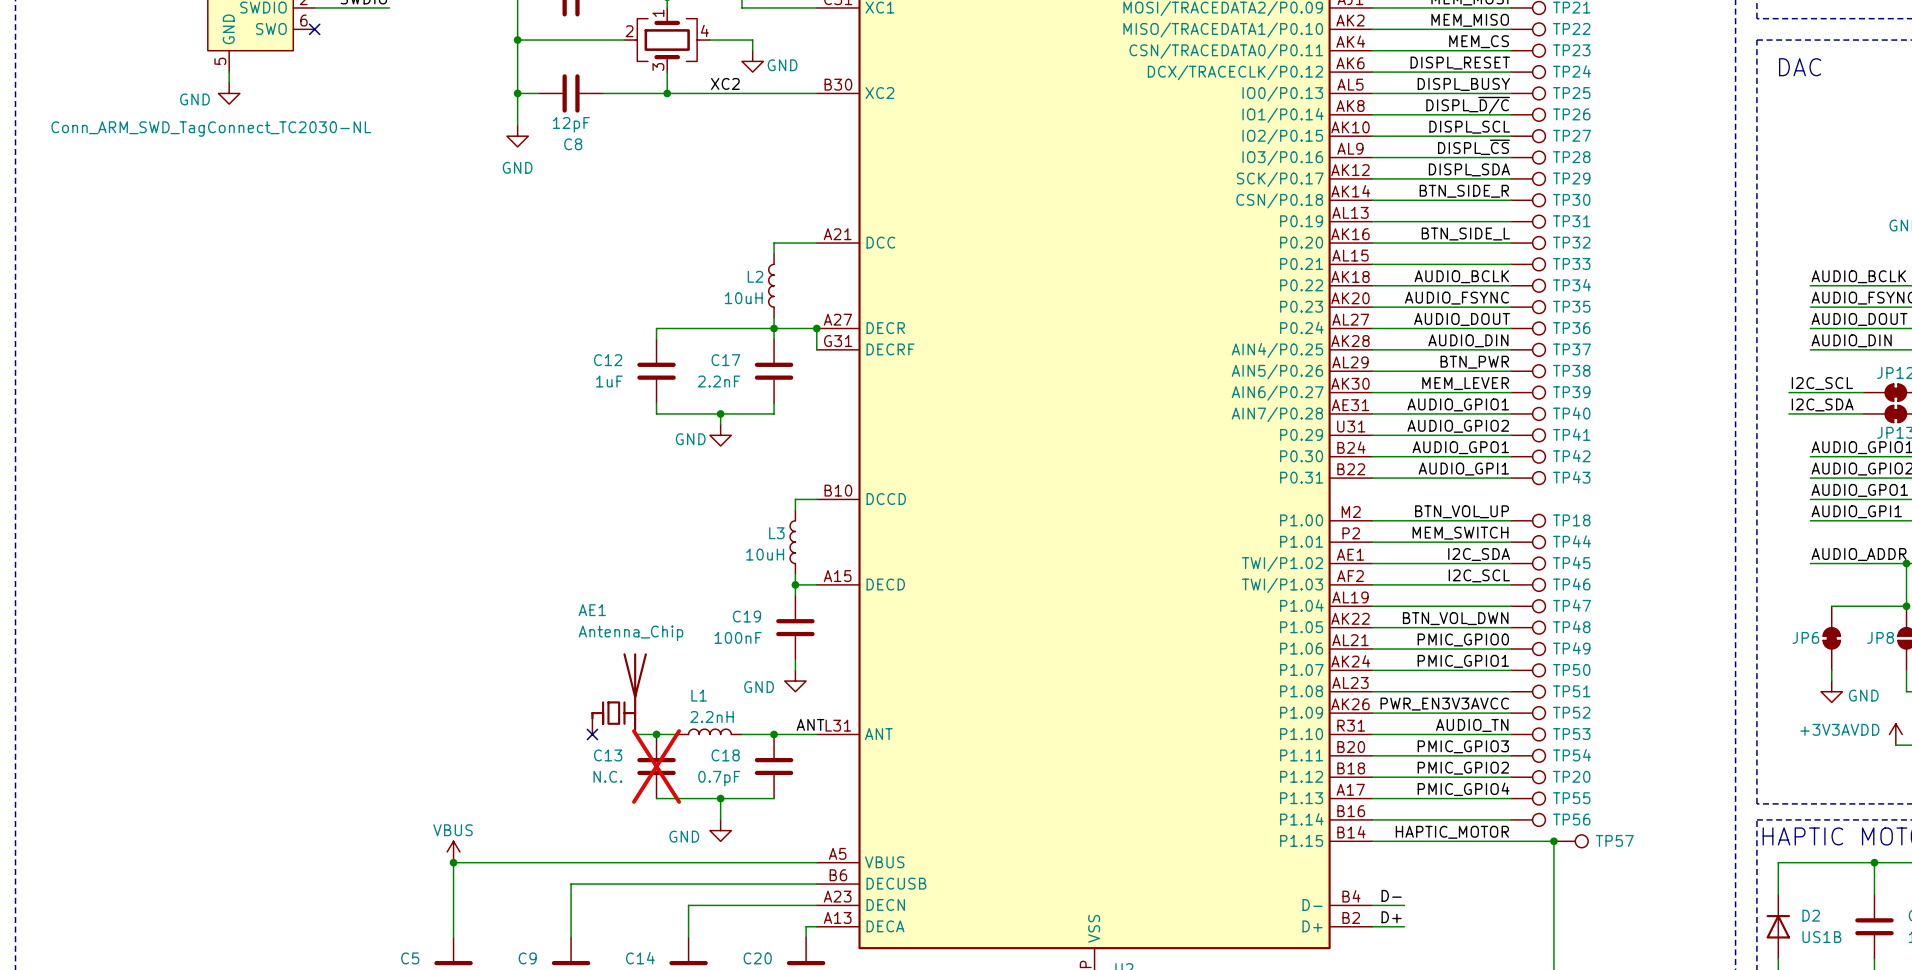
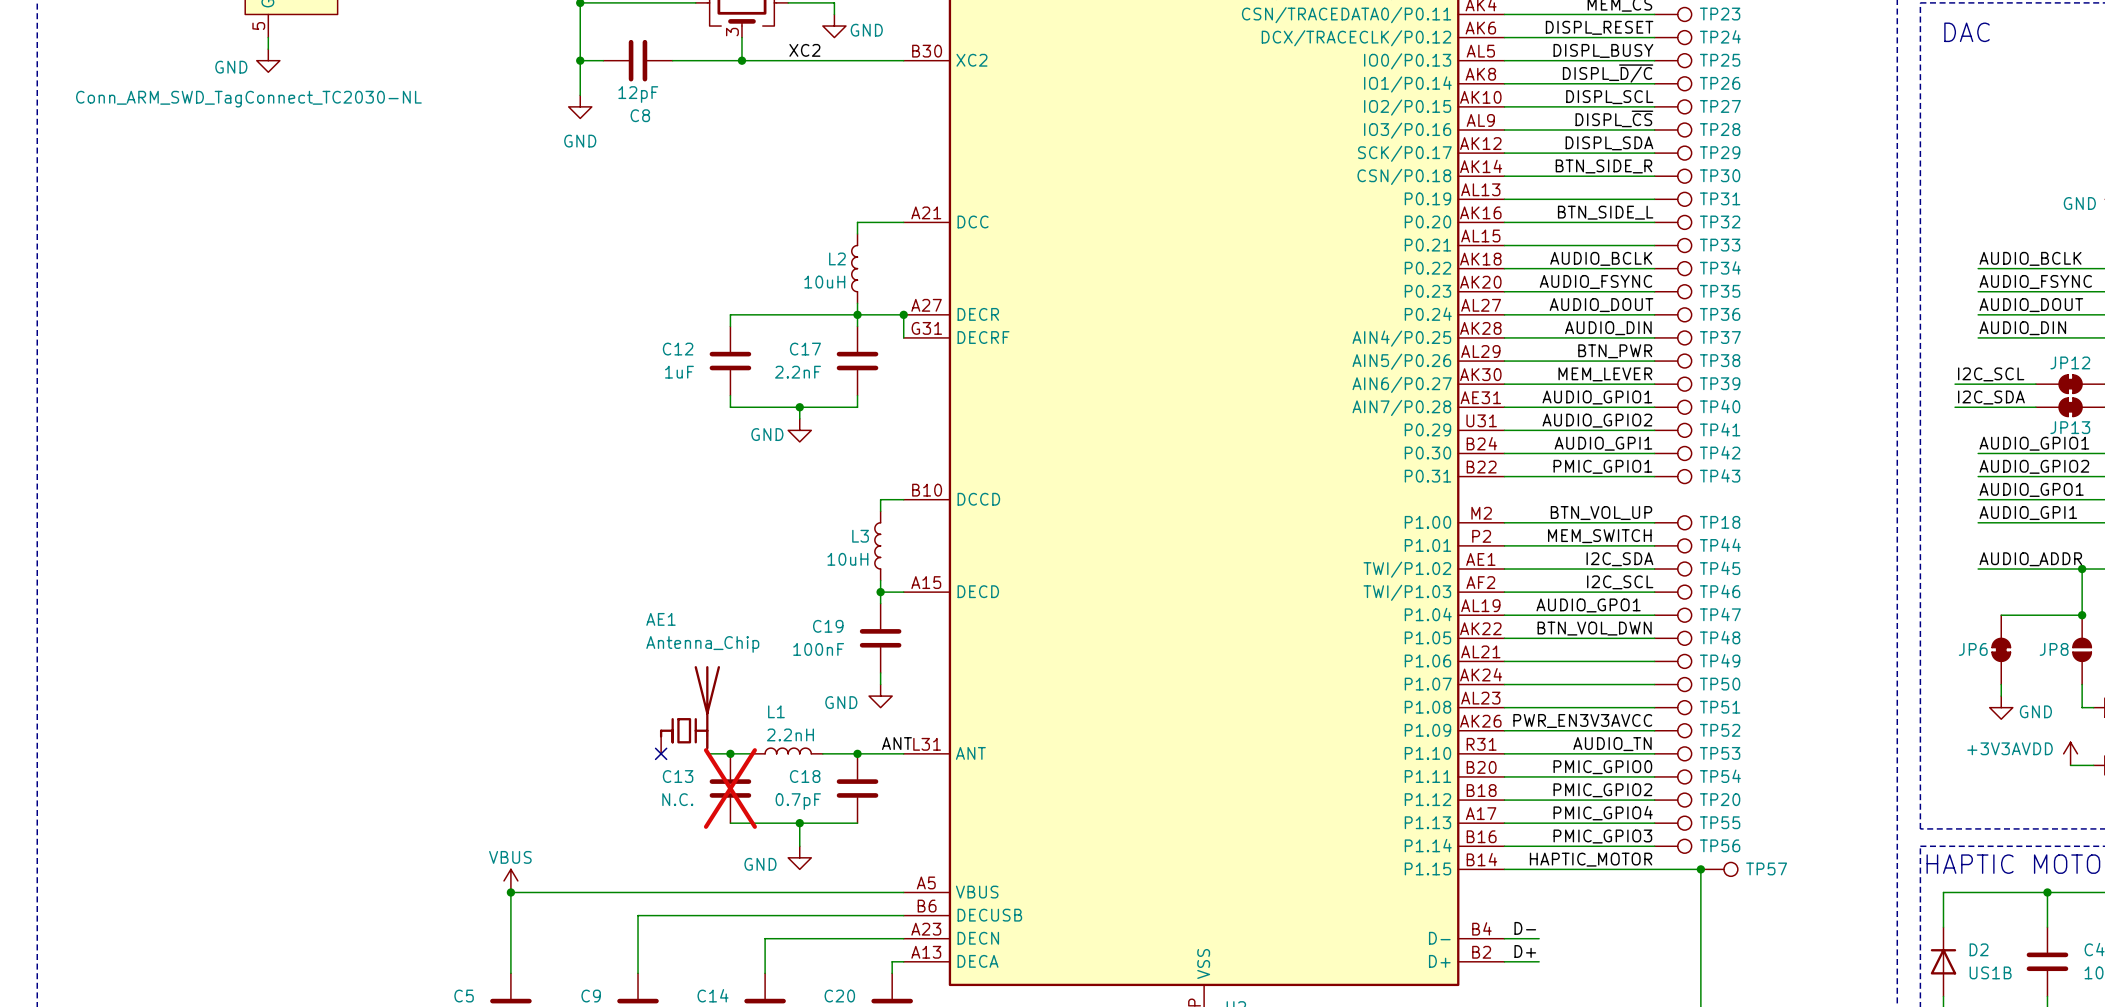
label: AUDIO_GPO1 (1460, 447) -> AUDIO_GPI1 (1603, 443)
label: AUDIO_GPI1 (1463, 469) -> PMIC_GPIO1 (1602, 466)
label: none -> AUDIO_GPO1 (1588, 605)
label: PMIC_GPIO0 (1463, 639) -> none
label: PMIC_GPIO1 (1463, 661) -> none
label: PMIC_GPIO3 (1463, 746) -> PMIC_GPIO0 (1602, 767)
label: none -> PMIC_GPIO3 (1602, 836)

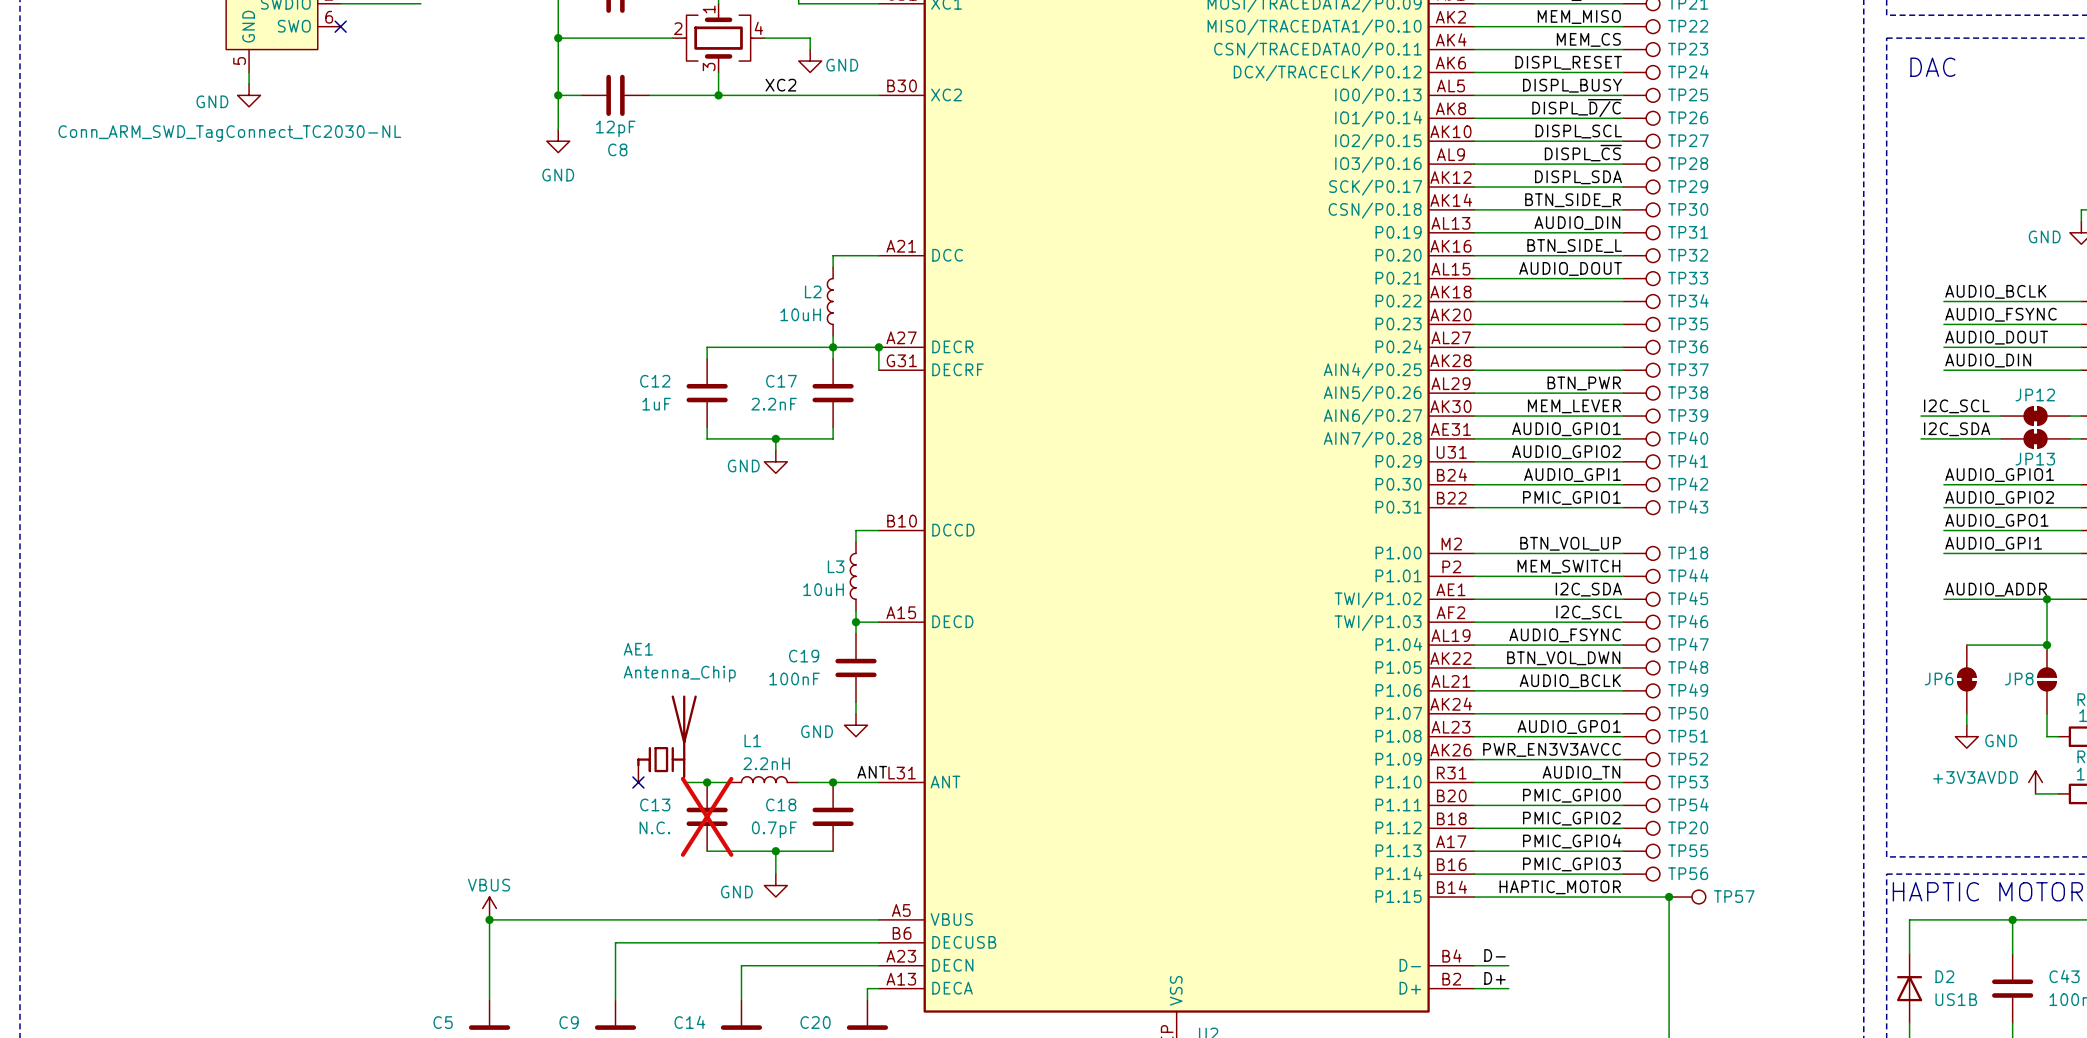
label: AUDIO_BCLK (1601, 258) -> none
label: AUDIO_FSYNC (1595, 281) -> none
label position: AUDIO_DOUT (1601, 305) -> AUDIO_DOUT (1570, 268)
label position: AUDIO_DIN (1608, 328) -> AUDIO_DIN (1577, 223)
label position: AUDIO_GPO1 (1588, 605) -> AUDIO_GPO1 (1569, 727)
label: none -> AUDIO_FSYNC (1565, 635)
label: none -> AUDIO_BCLK (1570, 681)

